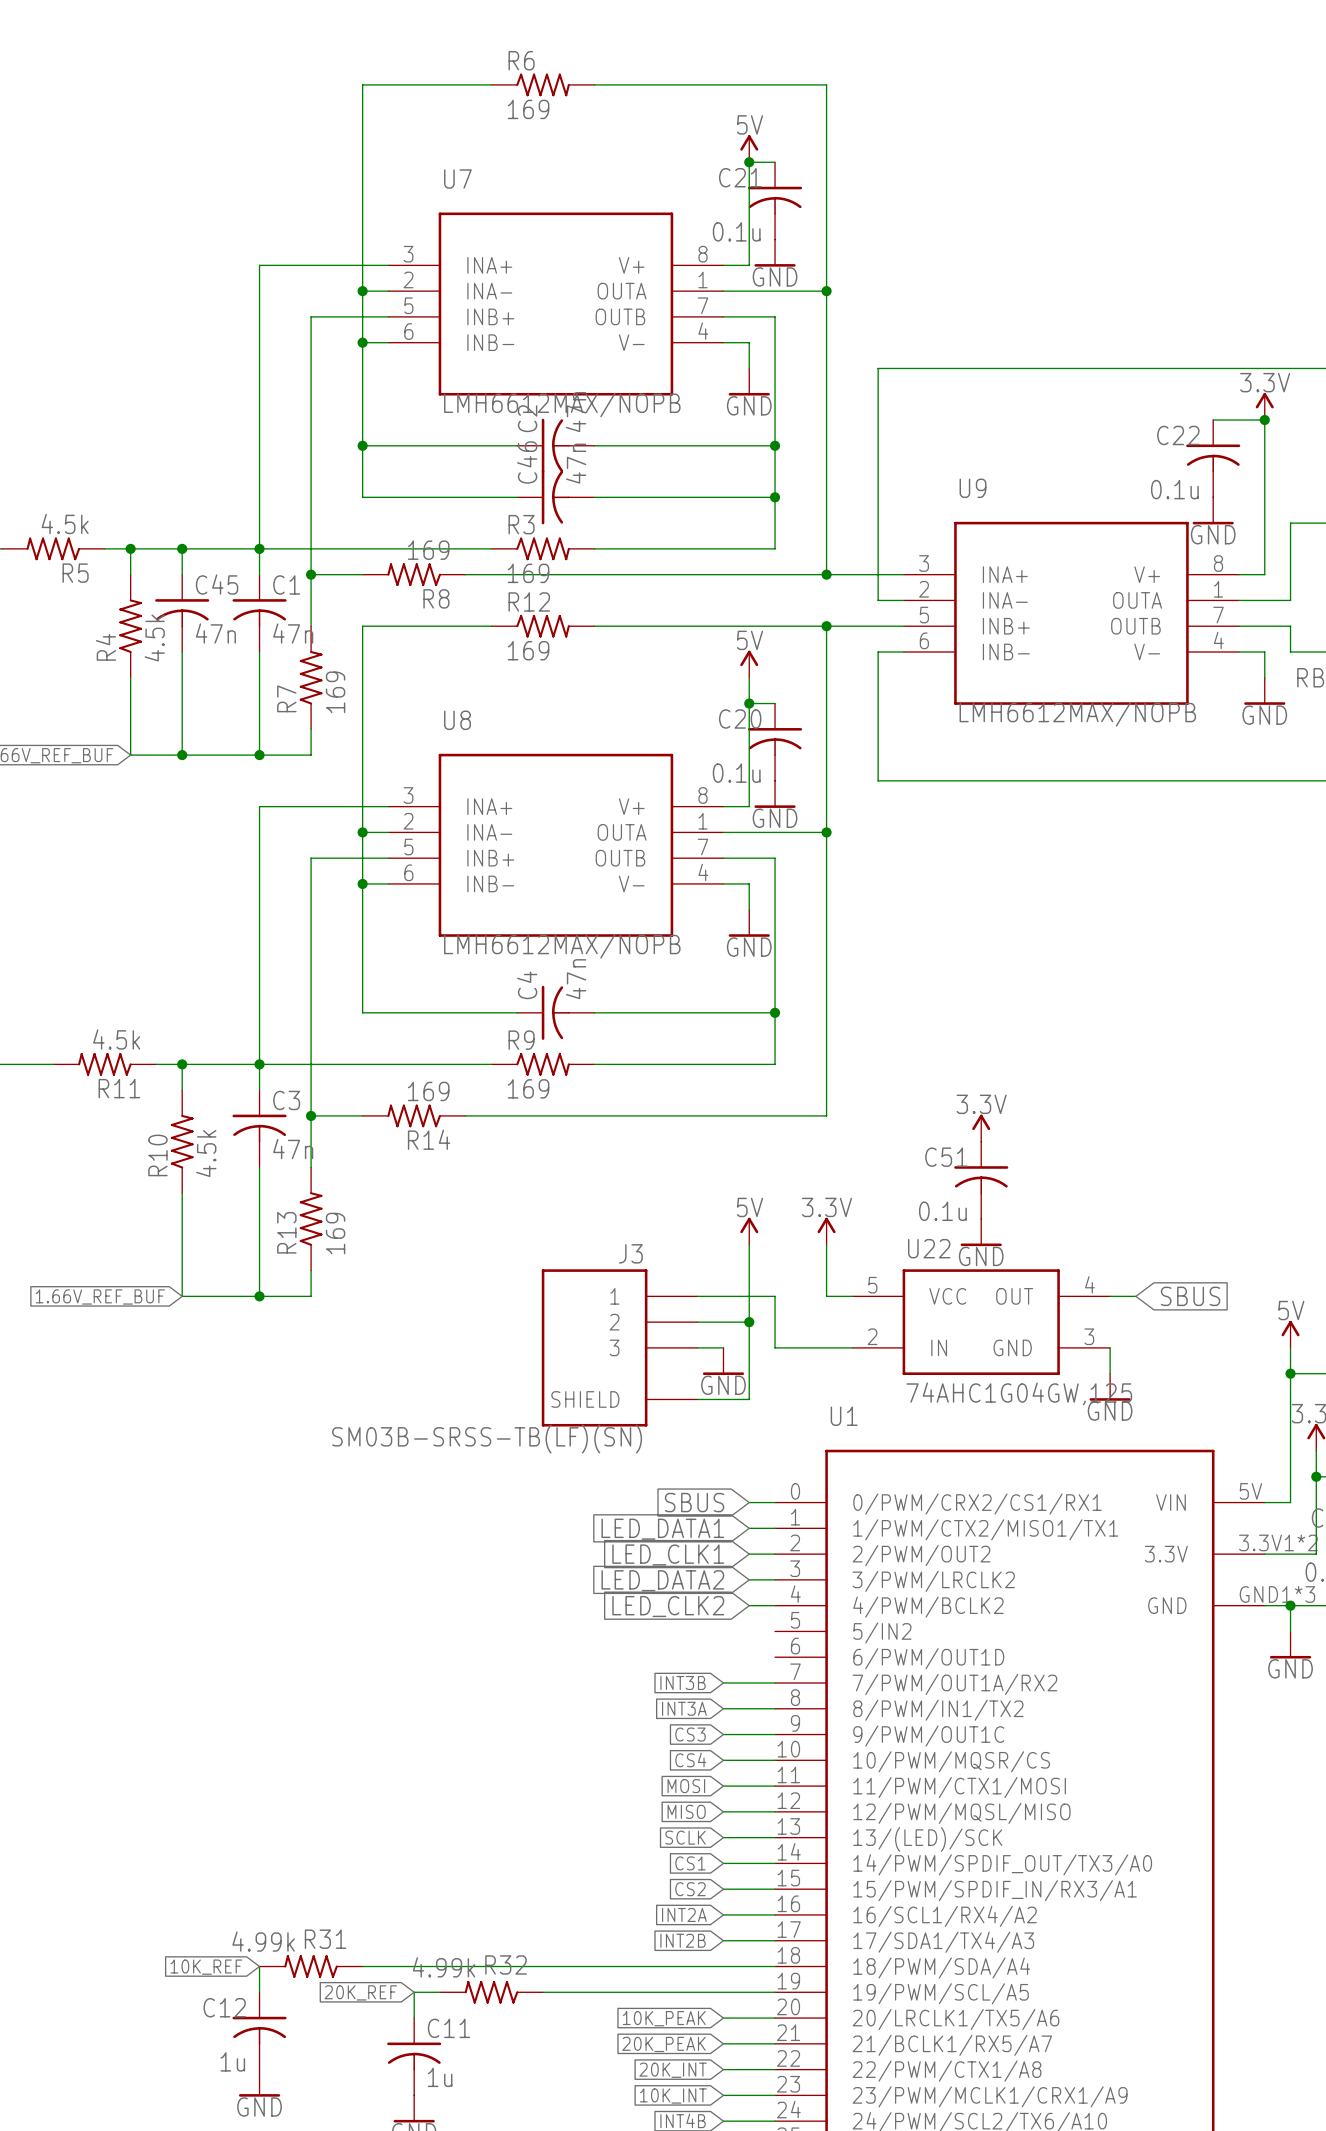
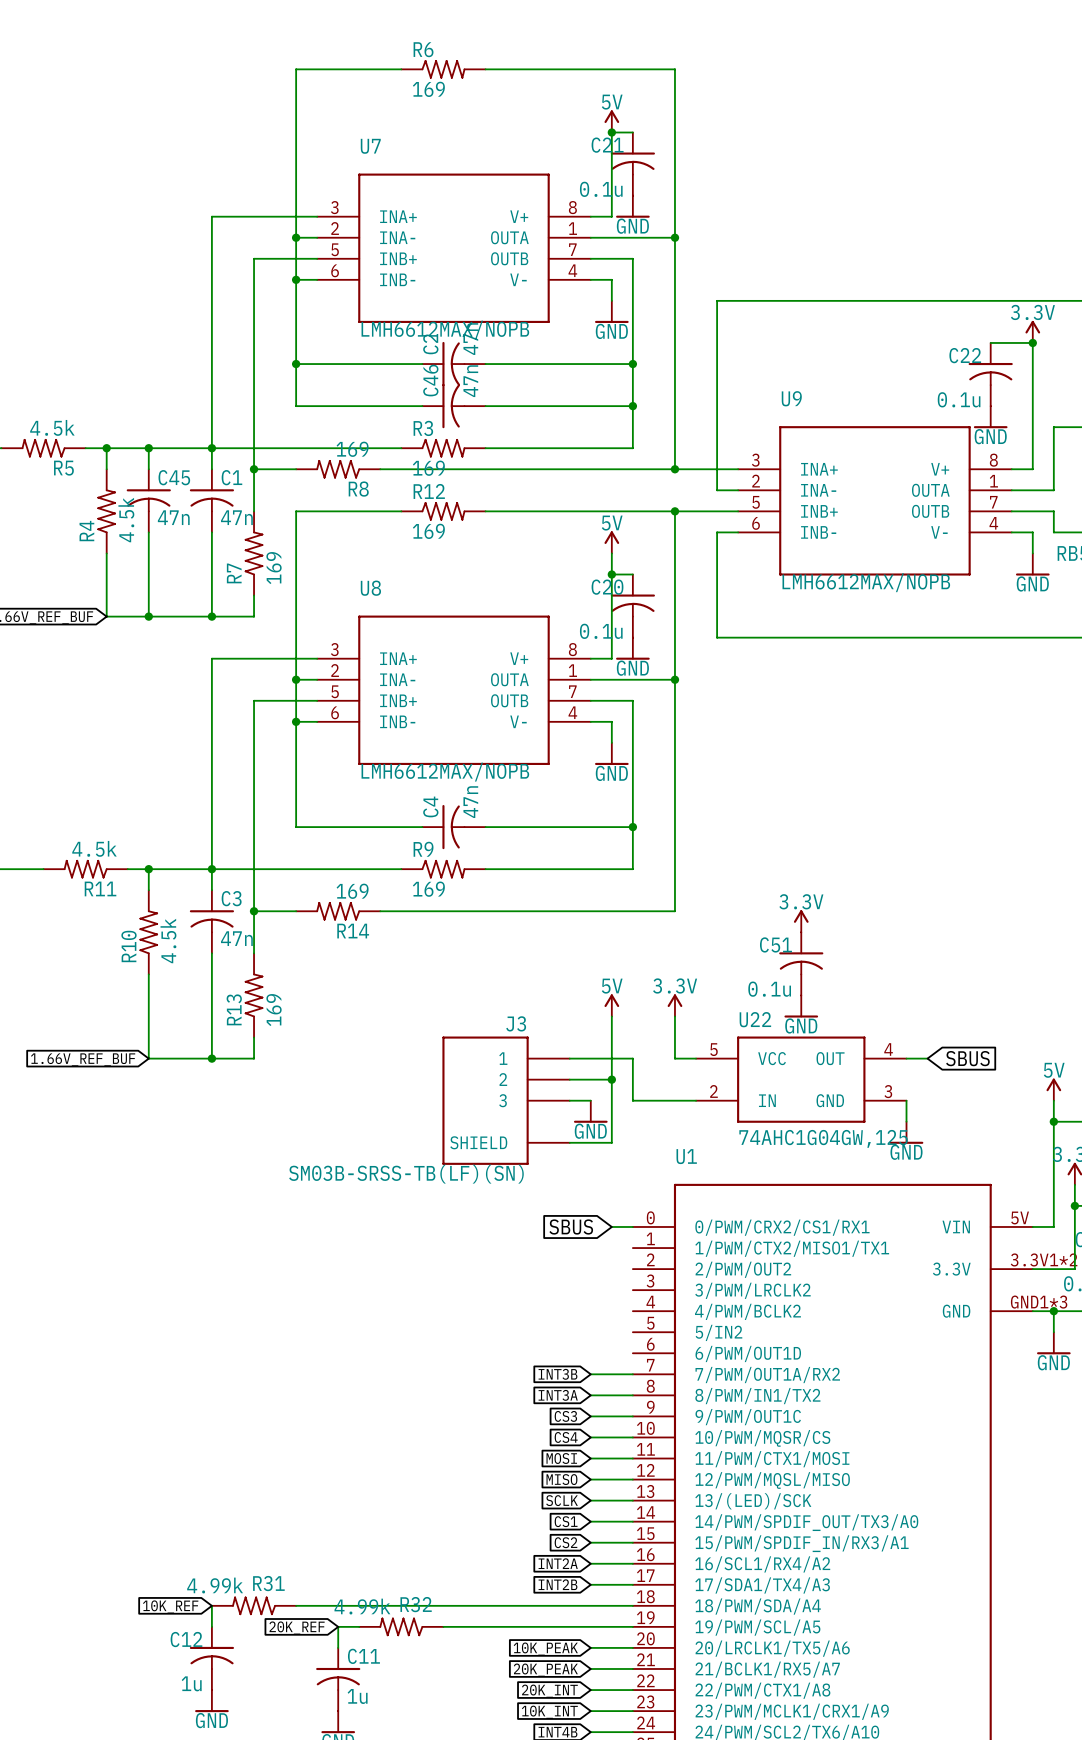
wire: (749, 1528) (775, 1528) -> none
global label: LED_DATA1 (662, 1529) -> none
global label: LED_CLK1 (668, 1554) -> none
wire: (749, 1554) (775, 1554) -> none
wire: (749, 1579) (775, 1579) -> none
global label: LED_DATA2 (662, 1580) -> none
wire: (749, 1605) (775, 1605) -> none
global label: LED_CLK2 (668, 1606) -> none

